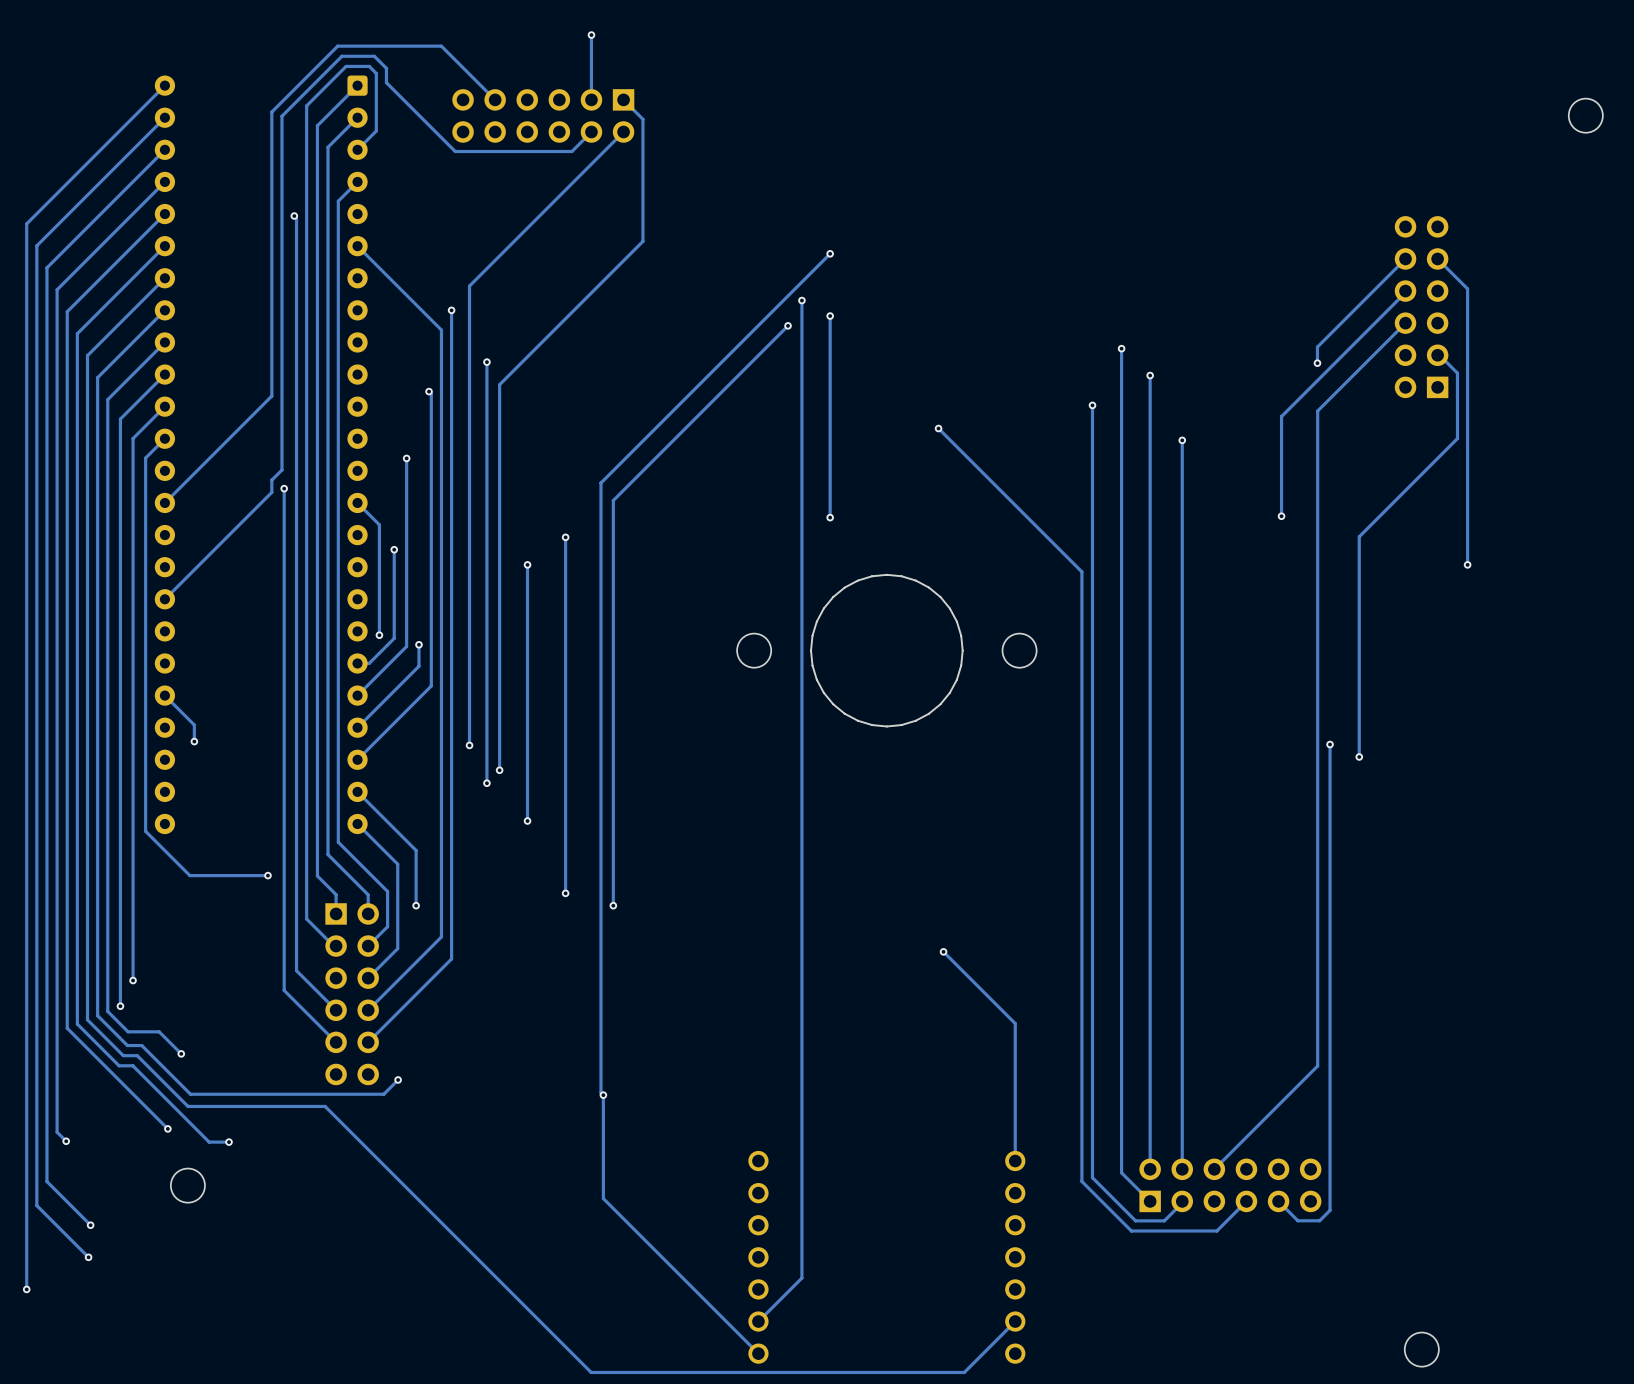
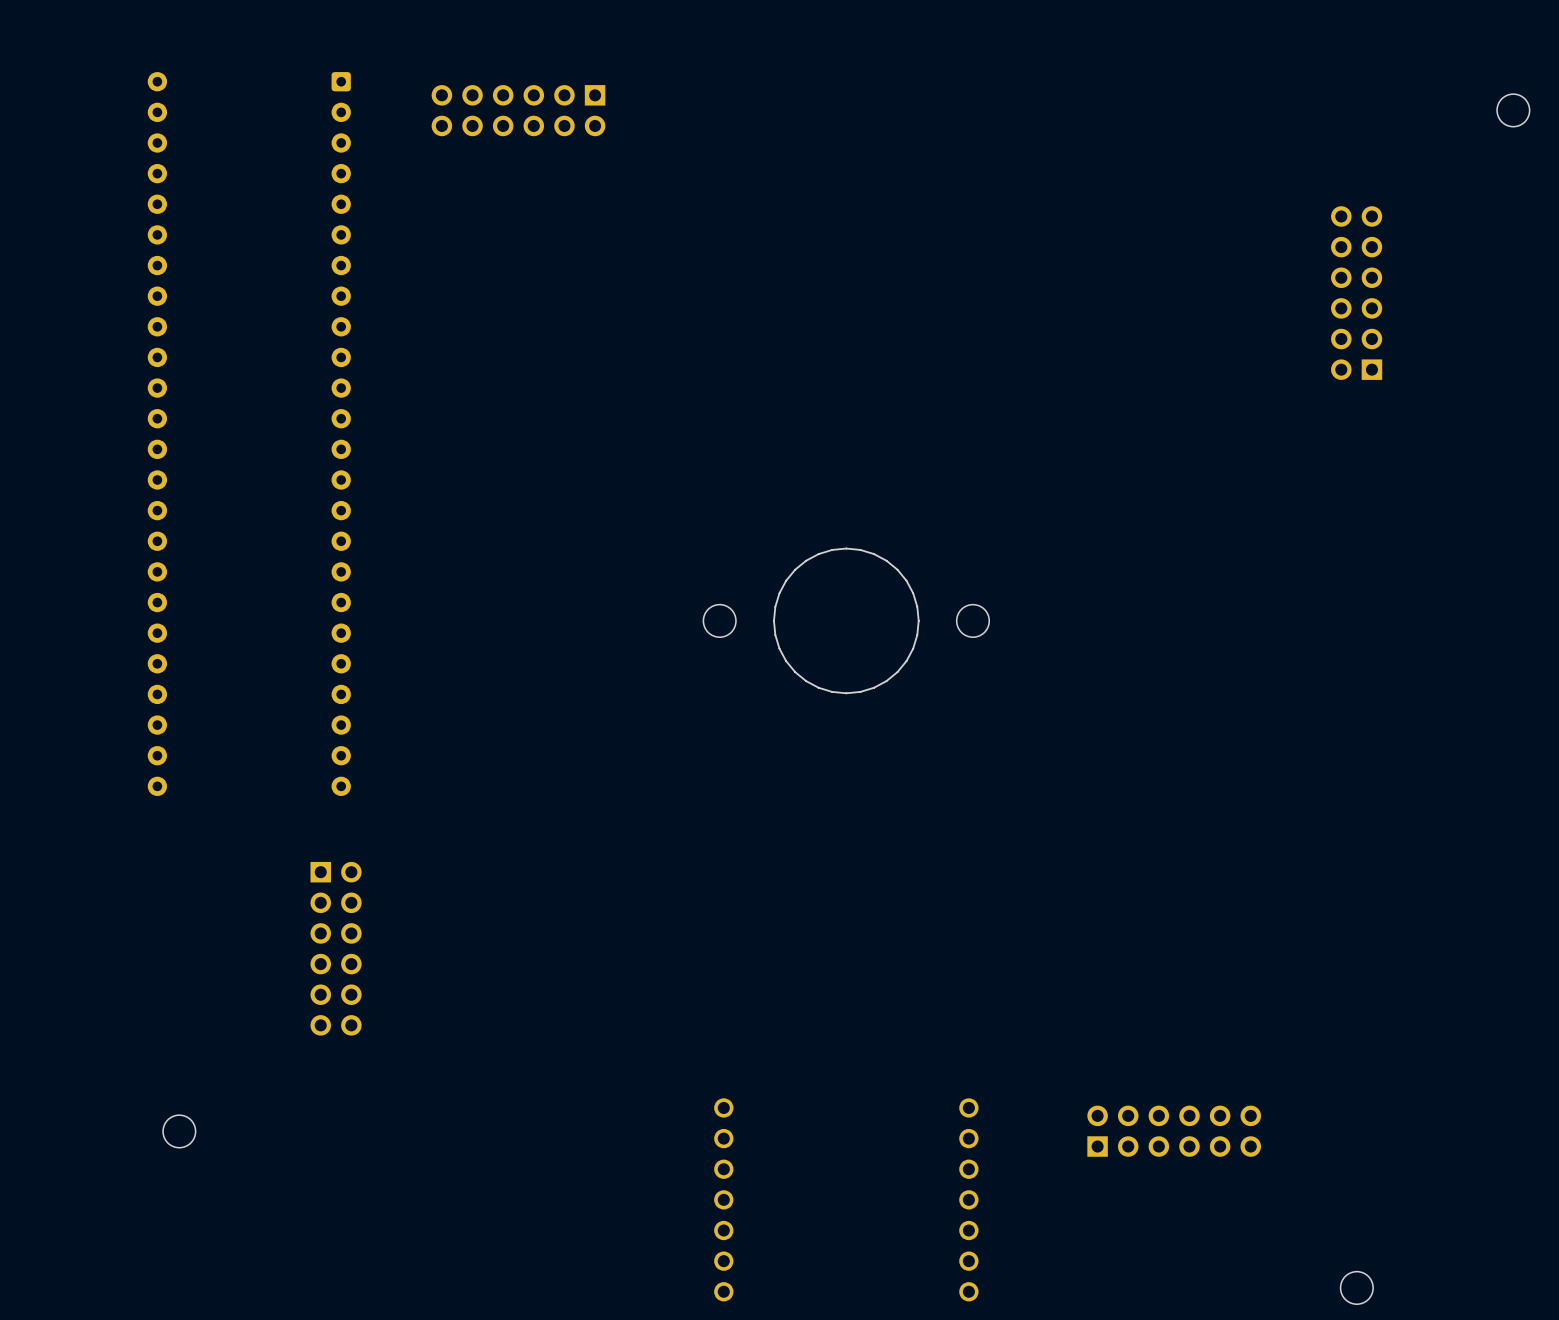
track: (591, 35) (591, 99) -> none
via: (591, 35) -> none
track: (164, 85) (26, 223) (26, 1289) -> none
track: (357, 85) (317, 125) (317, 875) (336, 894) (336, 913) -> none
track: (495, 99) (441, 46) (337, 46) (271, 112) (271, 396) (164, 502) -> none
track: (623, 99) (642, 119) (642, 241) (499, 384) (499, 770) -> none
track: (164, 117) (36, 245) (36, 1205) (88, 1257) -> none
track: (357, 117) (328, 147) (328, 854) (368, 894) (368, 913) -> none
track: (591, 131) (571, 151) (455, 151) (386, 82) (386, 68) (374, 56) (341, 56) (281, 116) (281, 470) (271, 480) (271, 492) (164, 599) -> none
track: (623, 131) (469, 286) (469, 745) -> none
track: (164, 149) (46, 267) (46, 1181) (90, 1225) -> none
track: (357, 149) (376, 131) (376, 73) (369, 66) (346, 66) (306, 105) (306, 919) (333, 946) (336, 946) -> none
track: (164, 181) (57, 289) (57, 1132) (66, 1141) -> none
track: (357, 181) (338, 201) (338, 842) (387, 891) (387, 926) (368, 946) -> none
track: (164, 214) (67, 311) (67, 1028) (167, 1128) -> none
track: (294, 216) (296, 218) (296, 970) (336, 1010) -> none
via: (294, 216) -> none
track: (164, 246) (77, 333) (77, 1024) (119, 1065) (132, 1065) (209, 1142) (229, 1142) -> none
track: (357, 246) (441, 330) (441, 937) (368, 1010) -> none
track: (830, 253) (600, 482) (600, 1092) (603, 1095) (603, 1198) (758, 1353) -> none
via: (830, 253) -> none
track: (1405, 258) (1317, 347) (1317, 363) -> none
track: (1437, 258) (1467, 288) (1467, 564) -> none
track: (164, 278) (87, 355) (87, 1019) (123, 1055) (137, 1055) (188, 1106) (325, 1106) (591, 1372) (964, 1372) (1015, 1321) -> none
track: (1405, 291) (1281, 416) (1281, 516) -> none
track: (801, 300) (801, 1278) (758, 1321) -> none
via: (801, 300) -> none
track: (164, 310) (97, 377) (97, 1015) (127, 1045) (141, 1045) (190, 1094) (383, 1094) (398, 1079) -> none
track: (451, 310) (451, 958) (368, 1042) -> none
via: (451, 310) -> none
track: (830, 316) (830, 517) -> none
via: (830, 316) -> none
track: (1405, 323) (1317, 411) (1317, 1066) (1214, 1169) -> none
track: (788, 325) (613, 500) (613, 905) -> none
via: (788, 325) -> none
track: (164, 342) (107, 399) (107, 1011) (128, 1031) (159, 1031) (181, 1053) -> none
track: (1121, 348) (1121, 1172) (1150, 1201) -> none
via: (1121, 348) -> none
track: (1437, 355) (1457, 373) (1457, 438) (1359, 536) (1359, 756) -> none
track: (486, 362) (486, 783) -> none
via: (486, 362) -> none
via: (1317, 363) -> none
track: (164, 374) (120, 419) (120, 1006) -> none
track: (1150, 375) (1150, 1169) -> none
via: (1150, 375) -> none
track: (429, 391) (431, 393) (431, 686) (357, 759) -> none
via: (429, 391) -> none
track: (1092, 405) (1092, 1177) (1135, 1220) (1164, 1220) (1182, 1201) -> none
via: (1092, 405) -> none
track: (164, 406) (133, 438) (133, 980) -> none
track: (938, 428) (1081, 571) (1081, 1181) (1131, 1231) (1216, 1231) (1246, 1201) -> none
via: (938, 428) -> none
track: (164, 438) (145, 458) (145, 831) (189, 875) (267, 875) -> none
track: (1182, 440) (1182, 1169) -> none
via: (1182, 440) -> none
track: (406, 458) (406, 646) (357, 695) -> none
via: (406, 458) -> none
track: (284, 488) (284, 990) (336, 1042) -> none
via: (284, 488) -> none
track: (357, 502) (379, 524) (379, 635) -> none
via: (1281, 516) -> none
via: (830, 517) -> none
track: (565, 537) (565, 893) -> none
via: (565, 537) -> none
track: (394, 549) (394, 638) (369, 663) (357, 663) -> none
via: (394, 549) -> none
track: (527, 564) (527, 821) -> none
via: (527, 564) -> none
via: (1467, 564) -> none
via: (379, 635) -> none
track: (418, 644) (418, 666) (357, 727) -> none
via: (418, 644) -> none
track: (164, 695) (194, 725) (194, 741) -> none
via: (194, 741) -> none
track: (1330, 744) (1330, 1210) (1319, 1220) (1297, 1220) (1278, 1201) -> none
via: (1330, 744) -> none
via: (469, 745) -> none
via: (1359, 756) -> none
via: (499, 770) -> none
via: (486, 783) -> none
track: (357, 791) (416, 850) (416, 905) -> none
via: (527, 821) -> none
track: (357, 824) (397, 864) (397, 948) (368, 978) -> none
via: (267, 875) -> none
via: (565, 893) -> none
via: (416, 905) -> none
via: (613, 905) -> none
track: (943, 951) (1015, 1023) (1015, 1161) -> none
via: (943, 951) -> none
via: (133, 980) -> none
via: (120, 1006) -> none
via: (181, 1053) -> none
via: (398, 1079) -> none
via: (603, 1095) -> none
via: (167, 1128) -> none
via: (66, 1141) -> none
via: (229, 1142) -> none
via: (90, 1225) -> none
via: (88, 1257) -> none
via: (26, 1289) -> none

